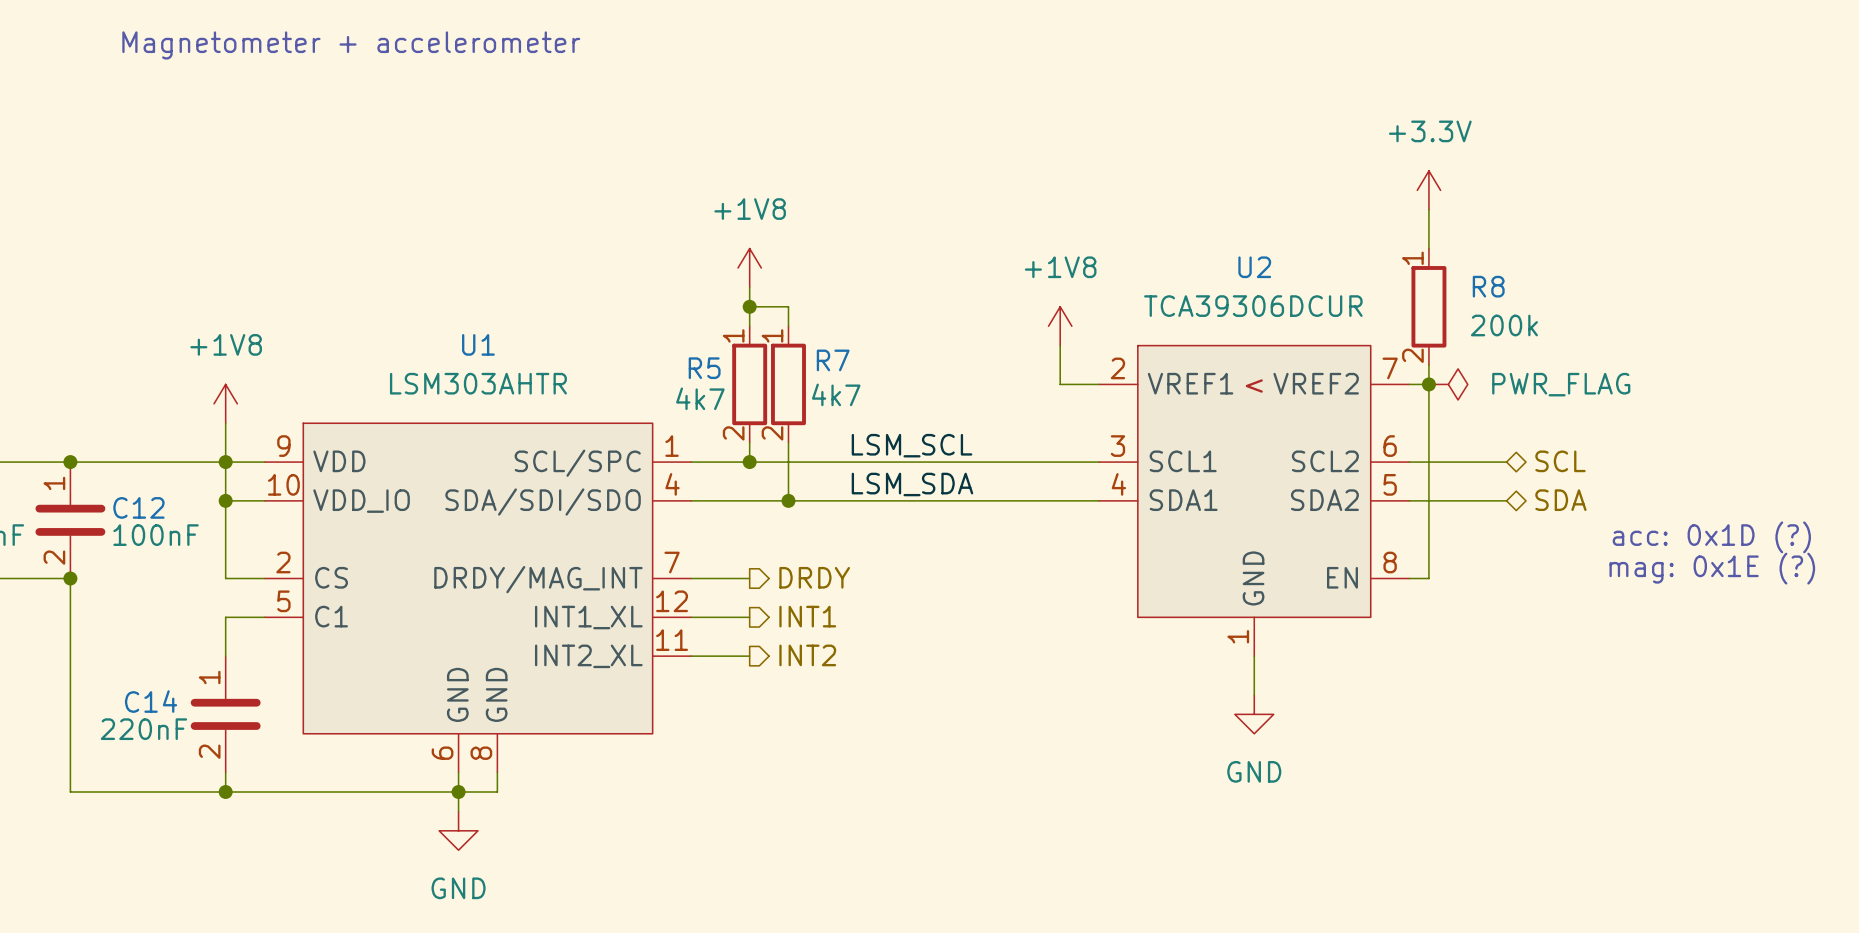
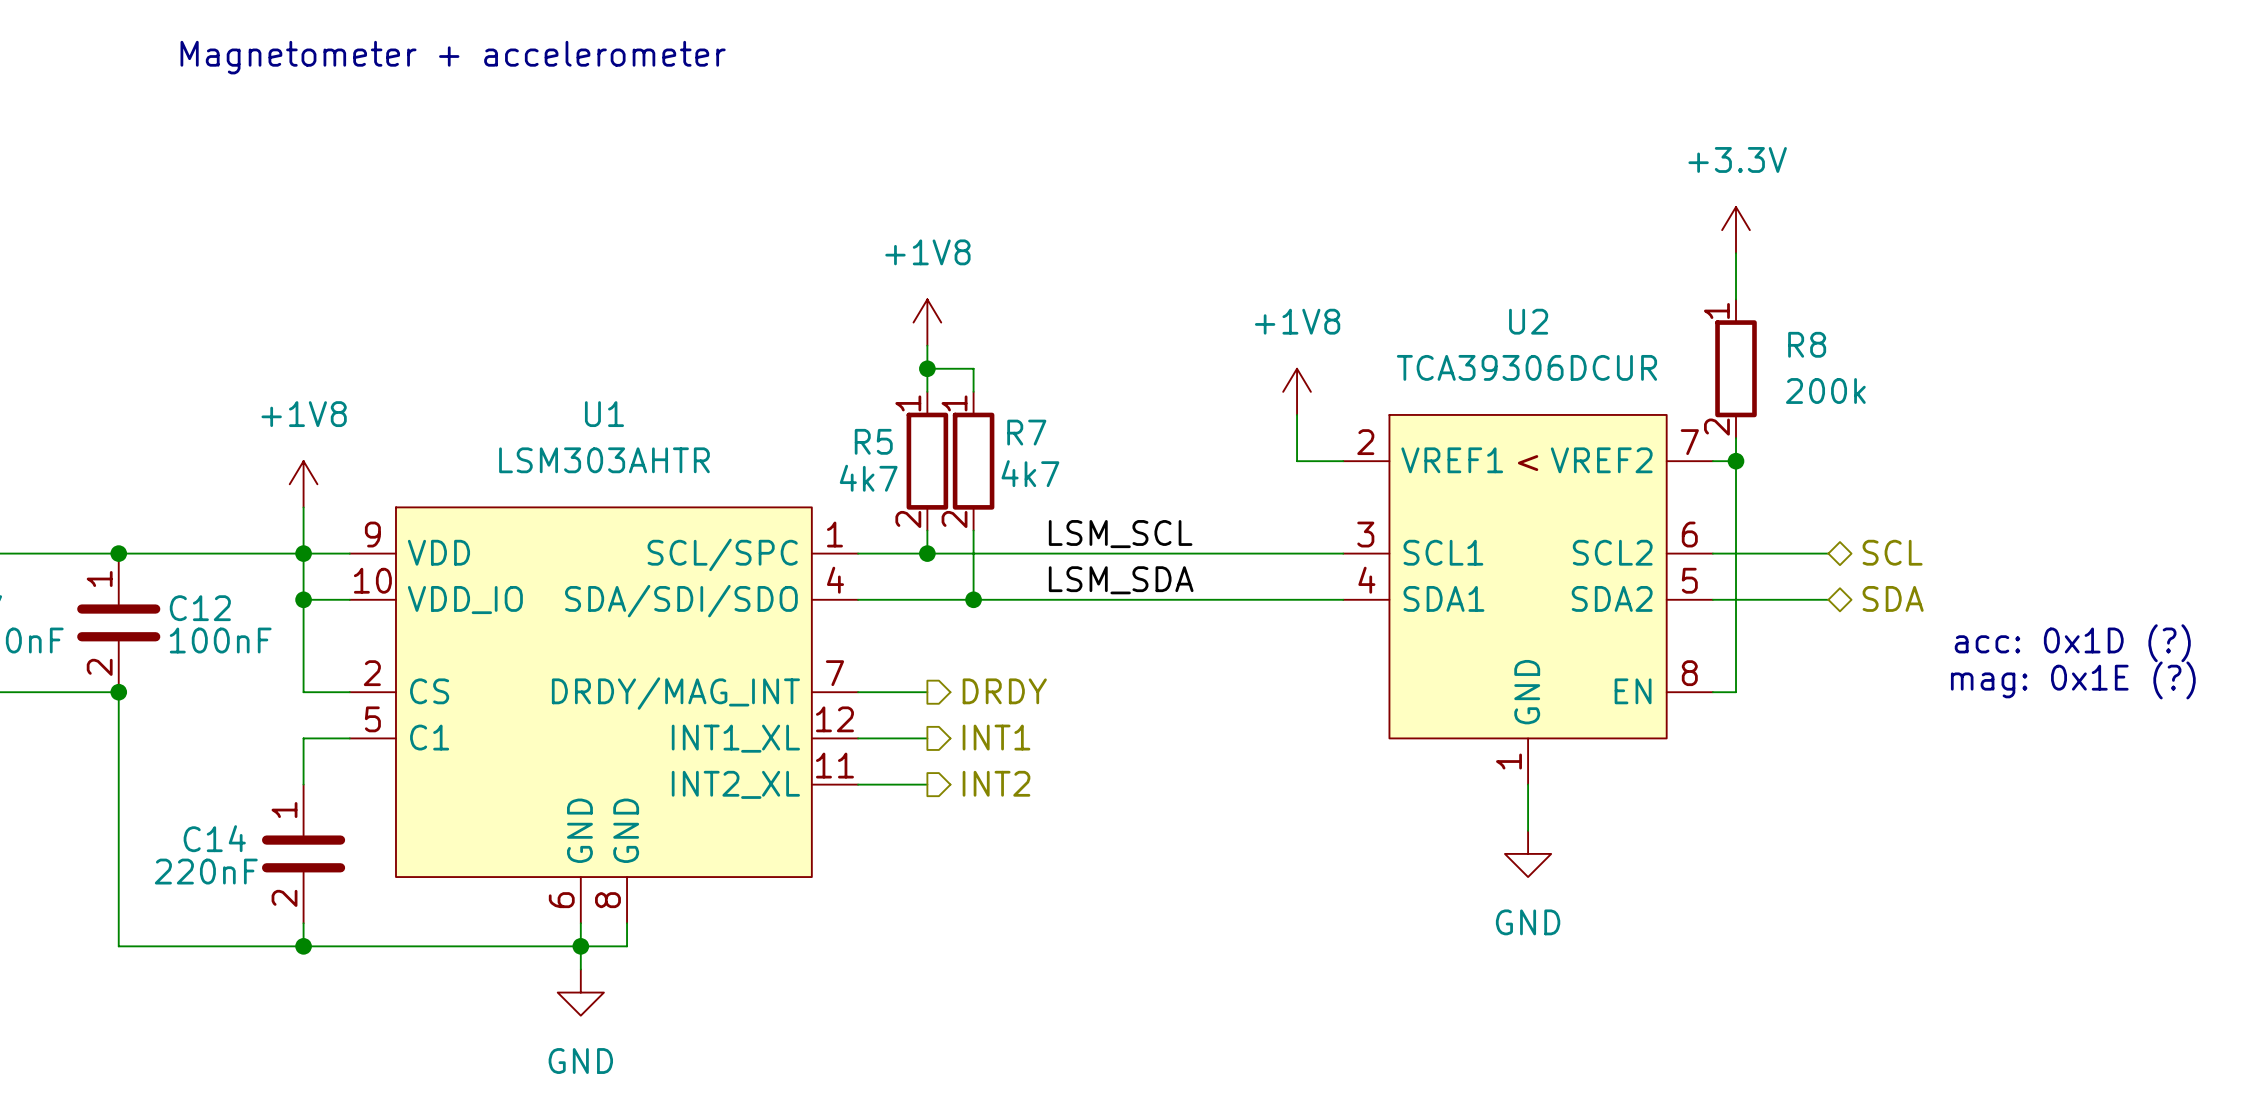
power symbol: PWR_FLAG (1448, 384) -> none

